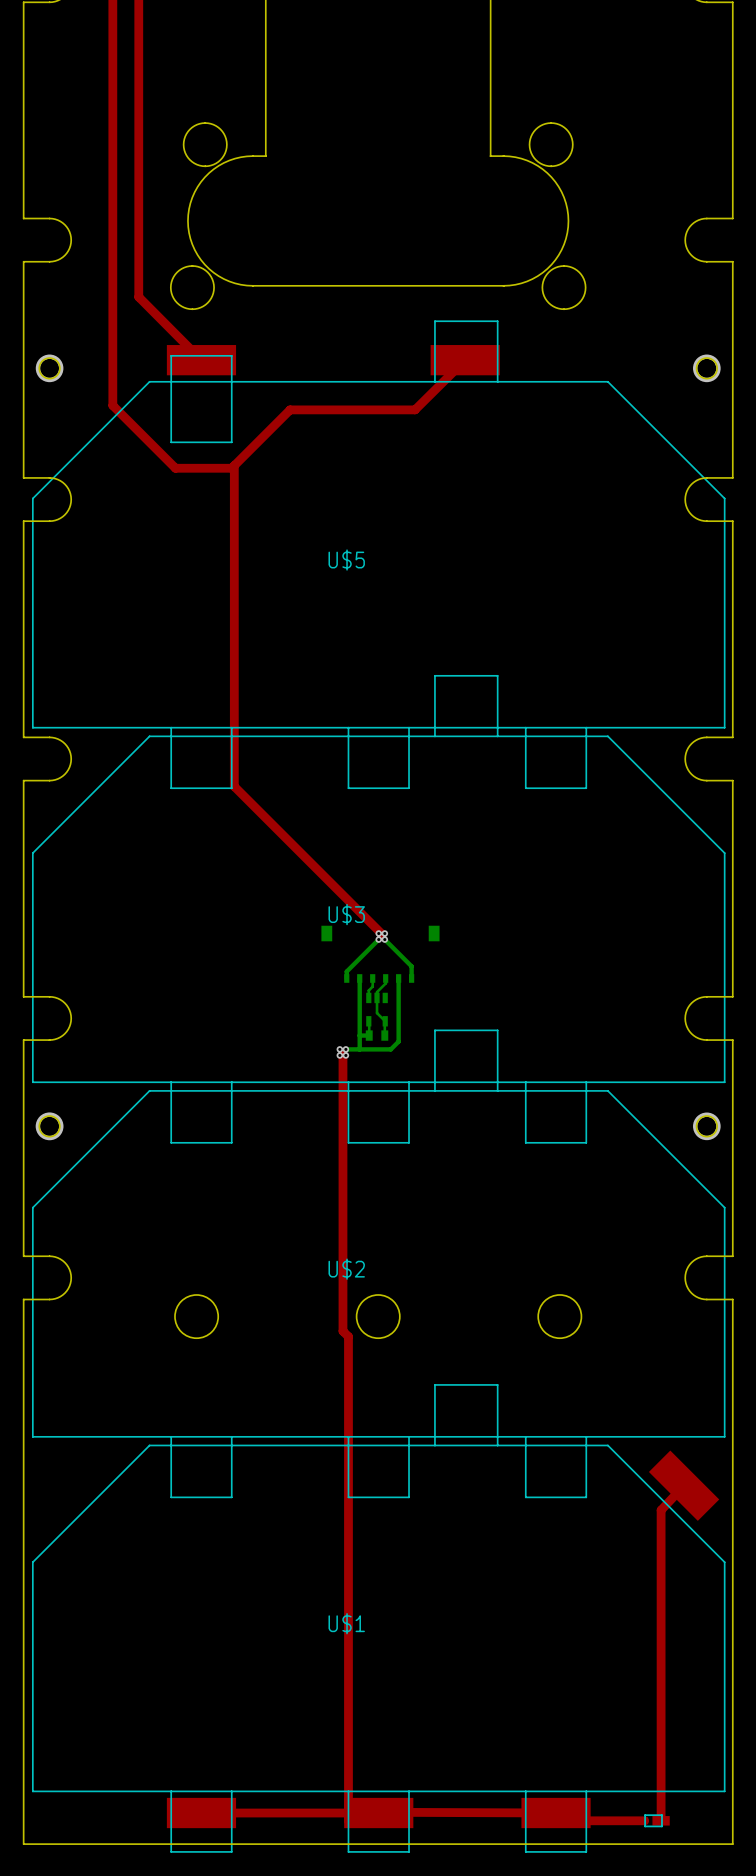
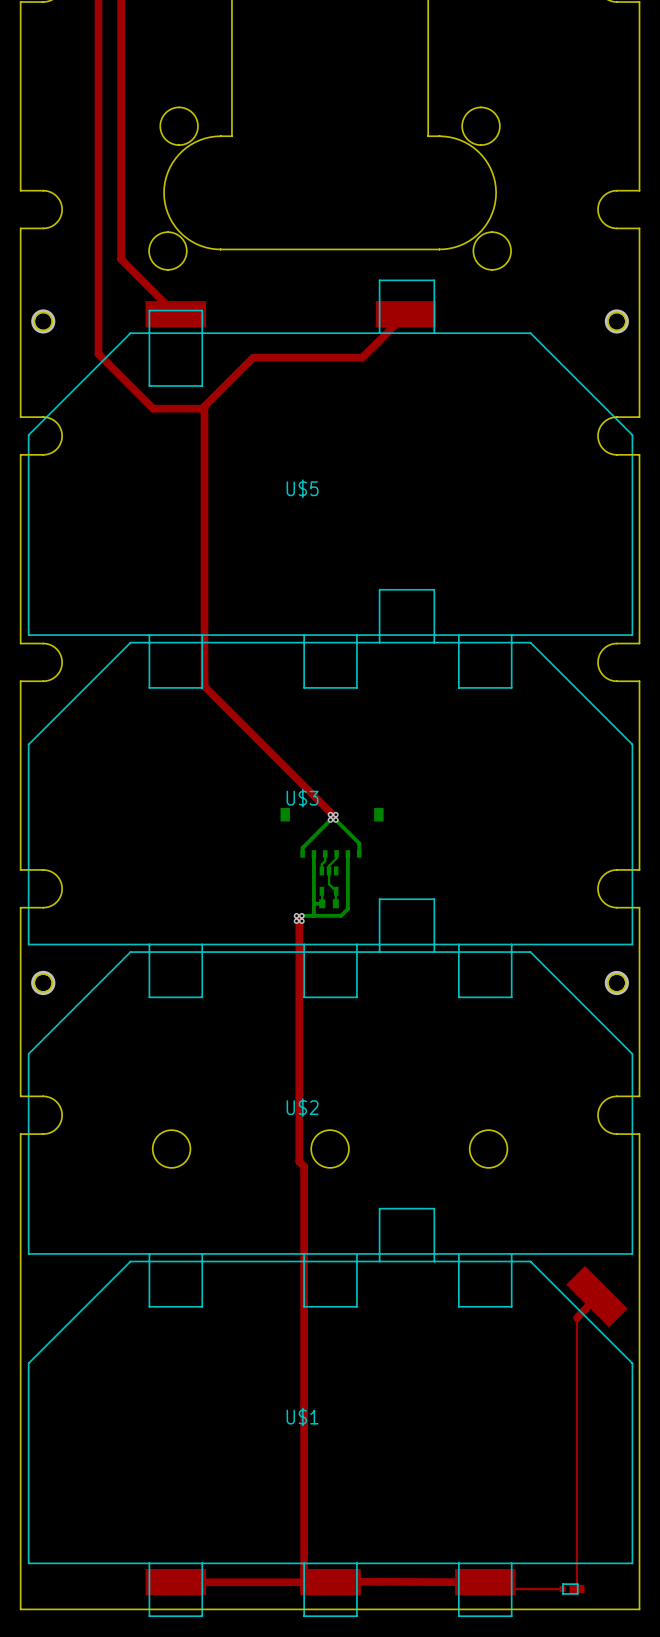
top track width: thick (661, 1510) (661, 1820) -> thin (576, 1318) (576, 1589)
top track width: thick (563, 1820) (644, 1820) -> thin (492, 1589) (562, 1589)

